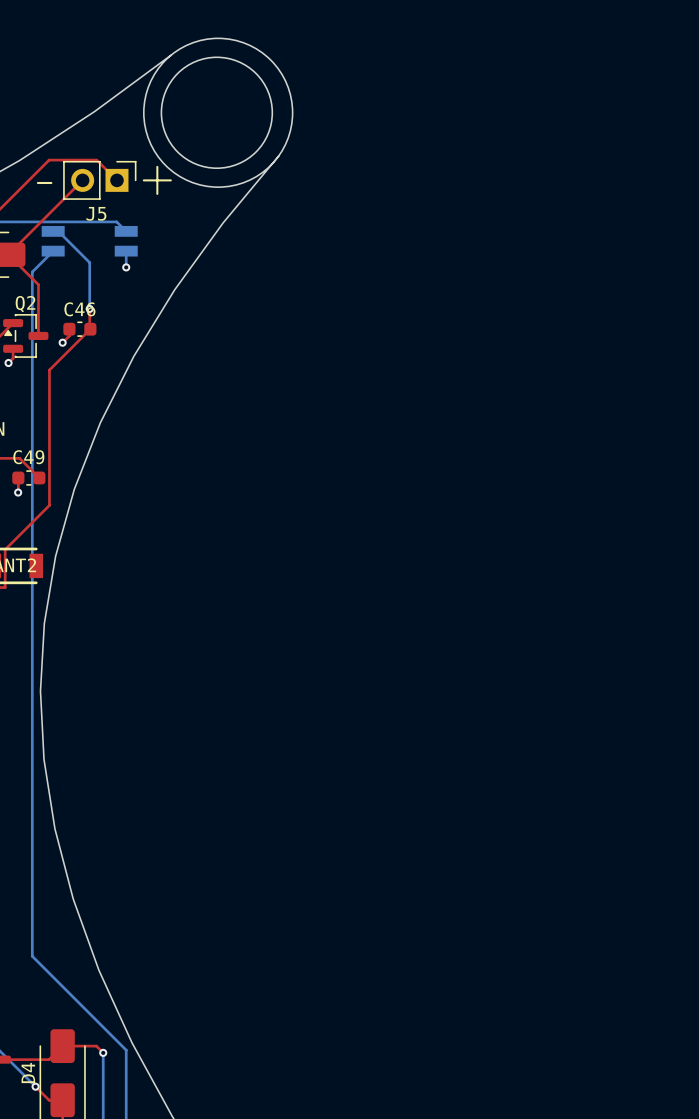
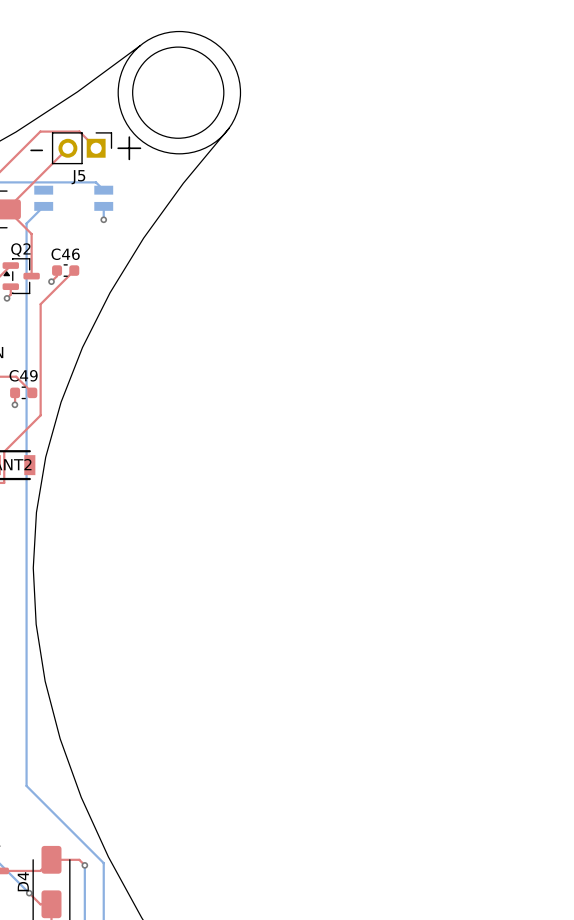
bottom track: (53, 231) (58, 231) (89, 262) (89, 308) -> none
top track: (89, 308) (90, 329) -> none
via: (89, 308) -> none

